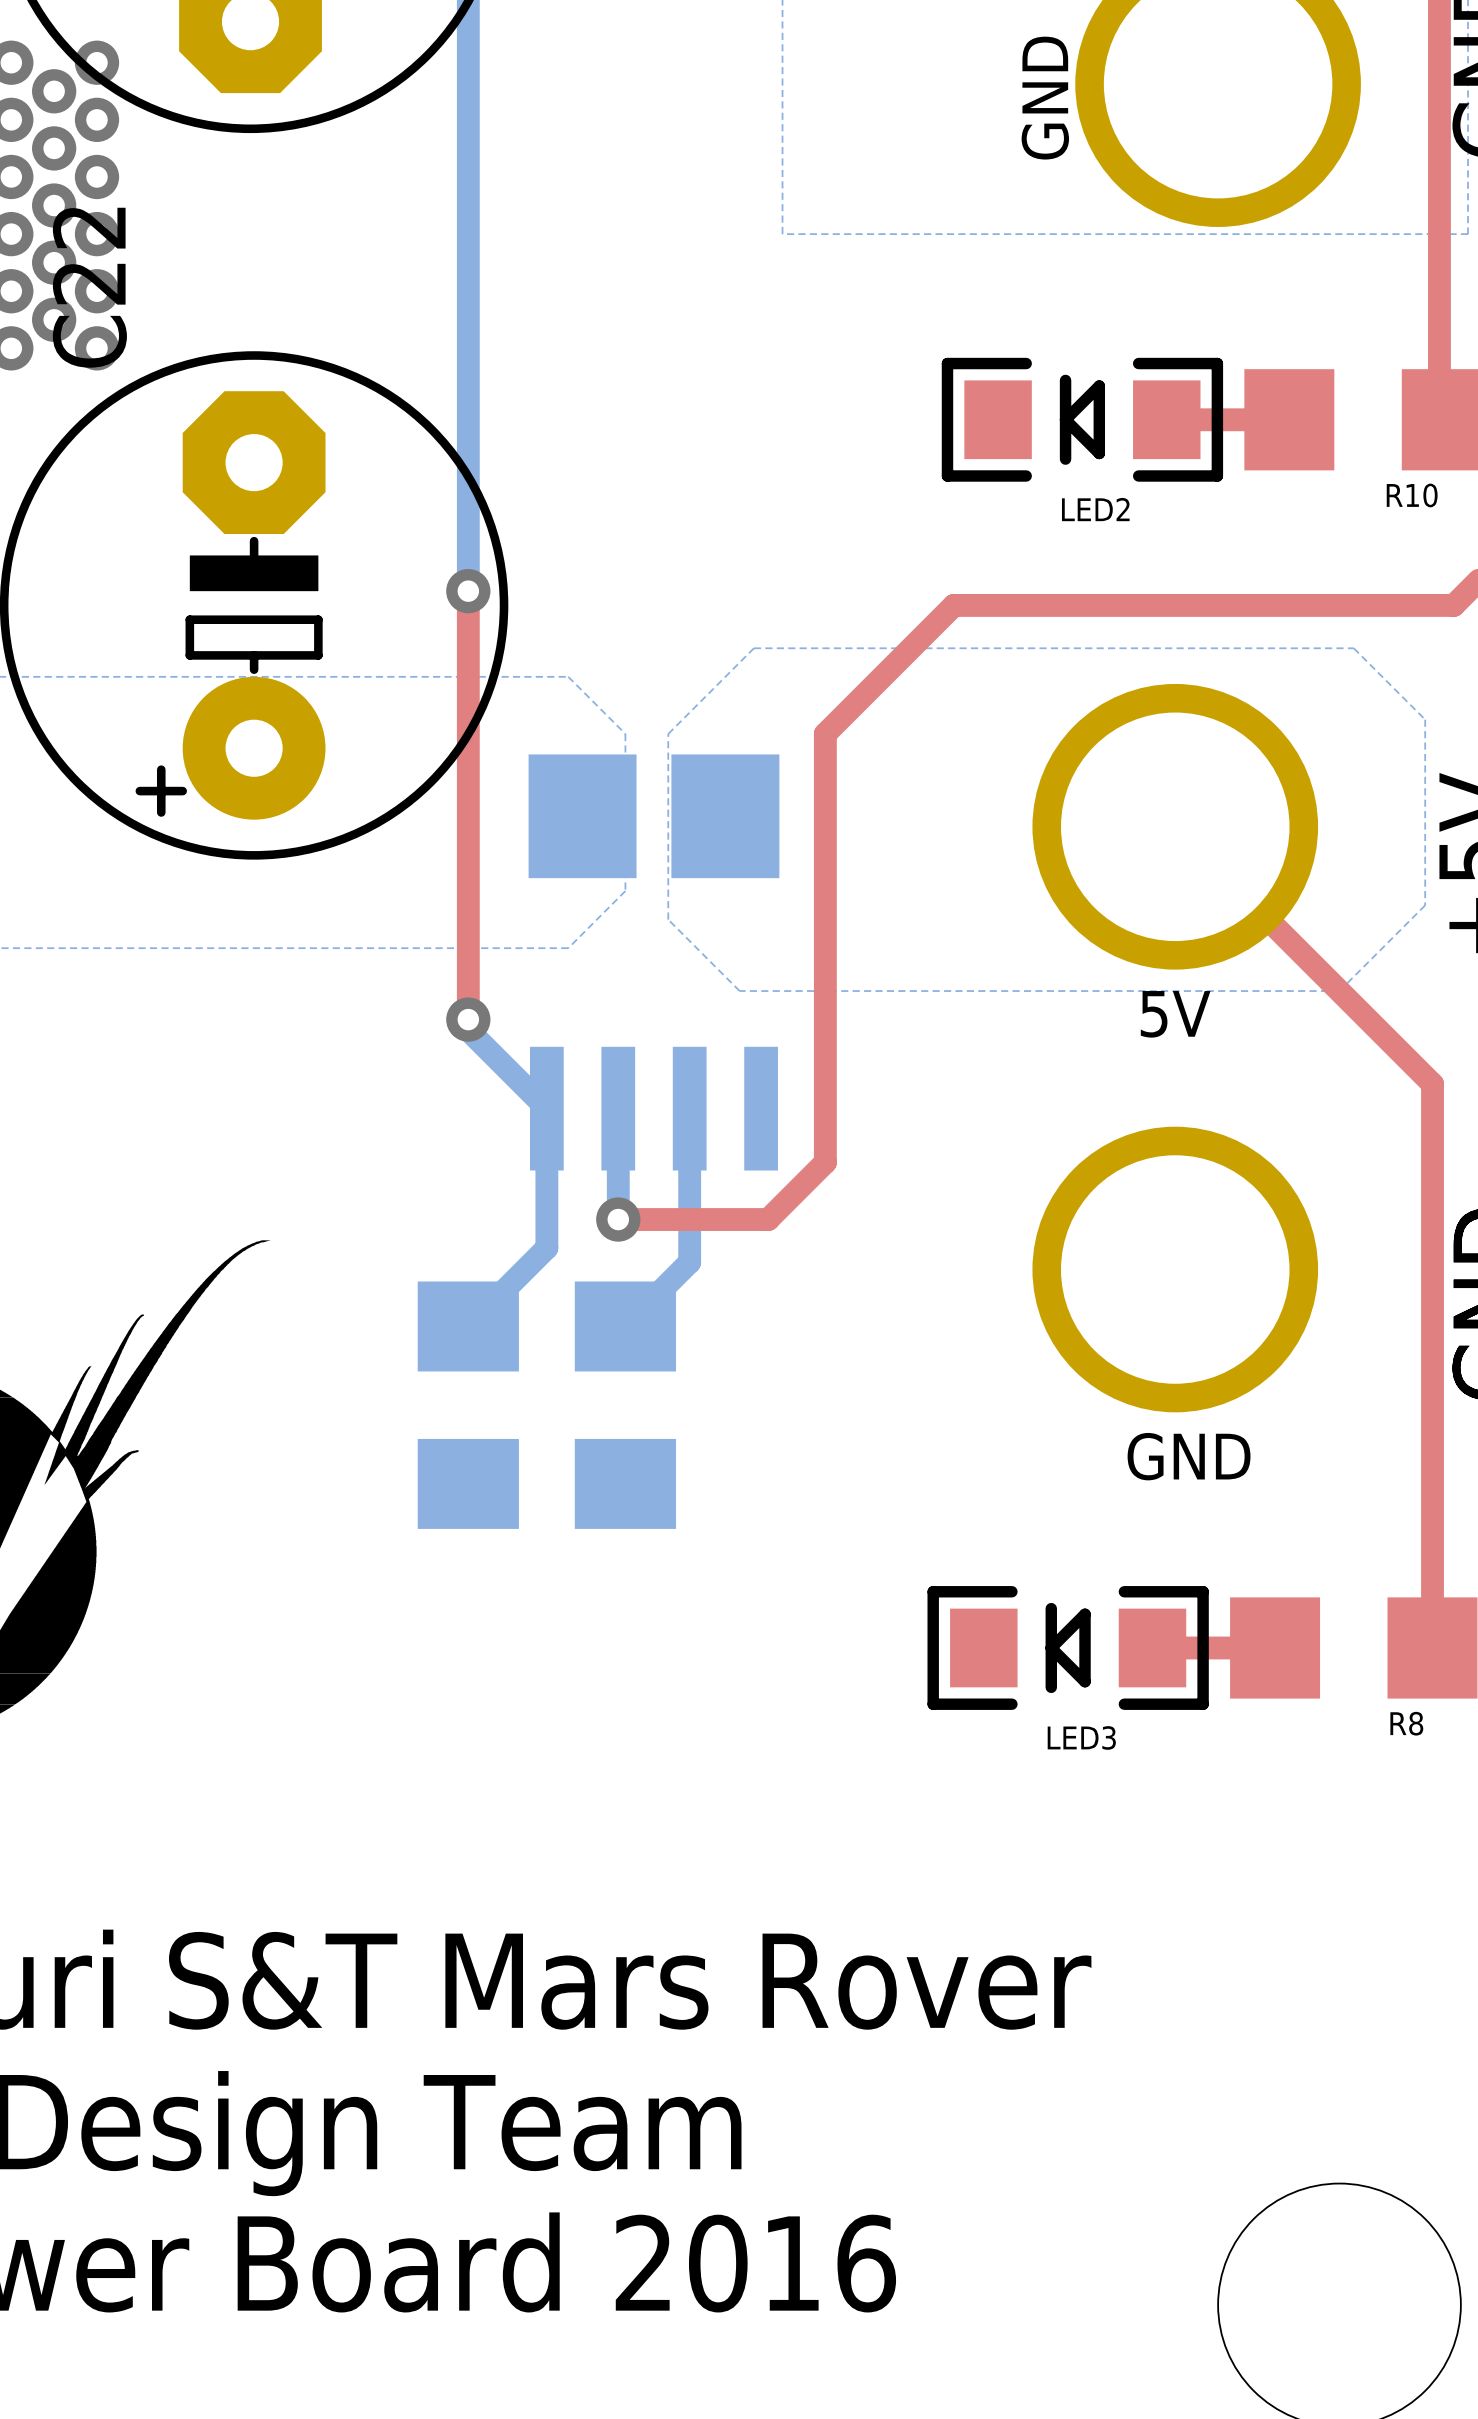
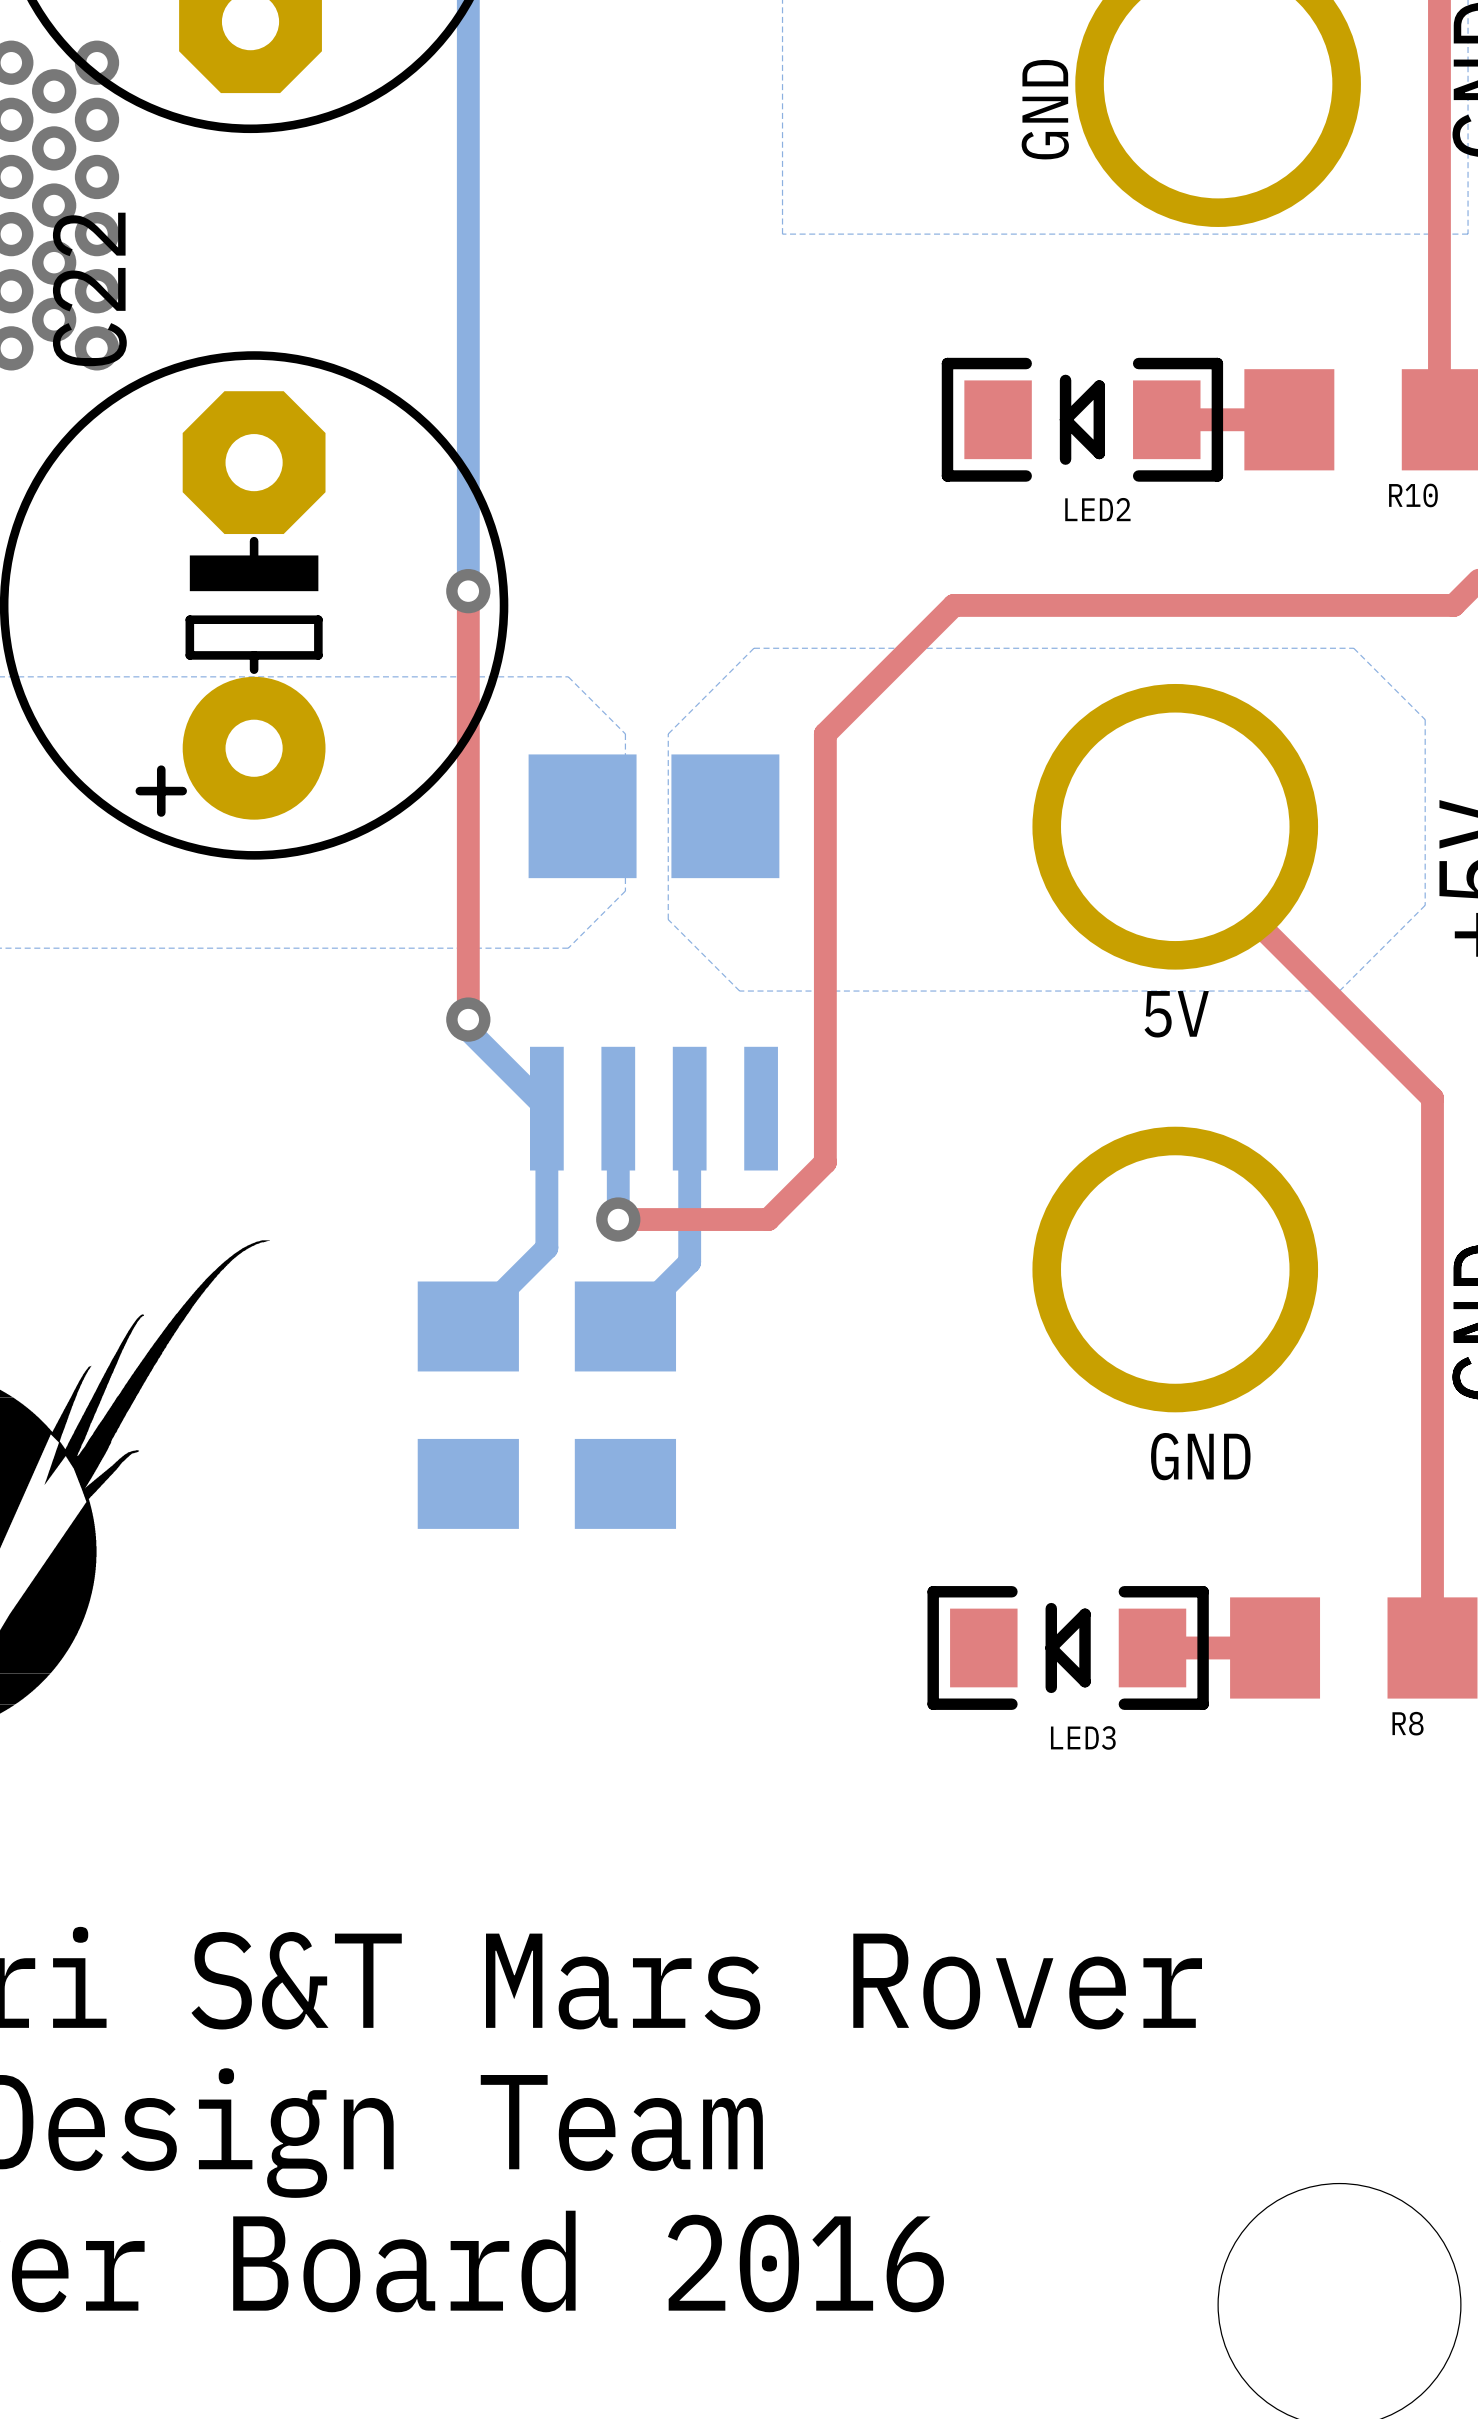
top track: (1175, 826) (1432, 1084) (1432, 1098) -> (1160, 826) (1432, 1098)

